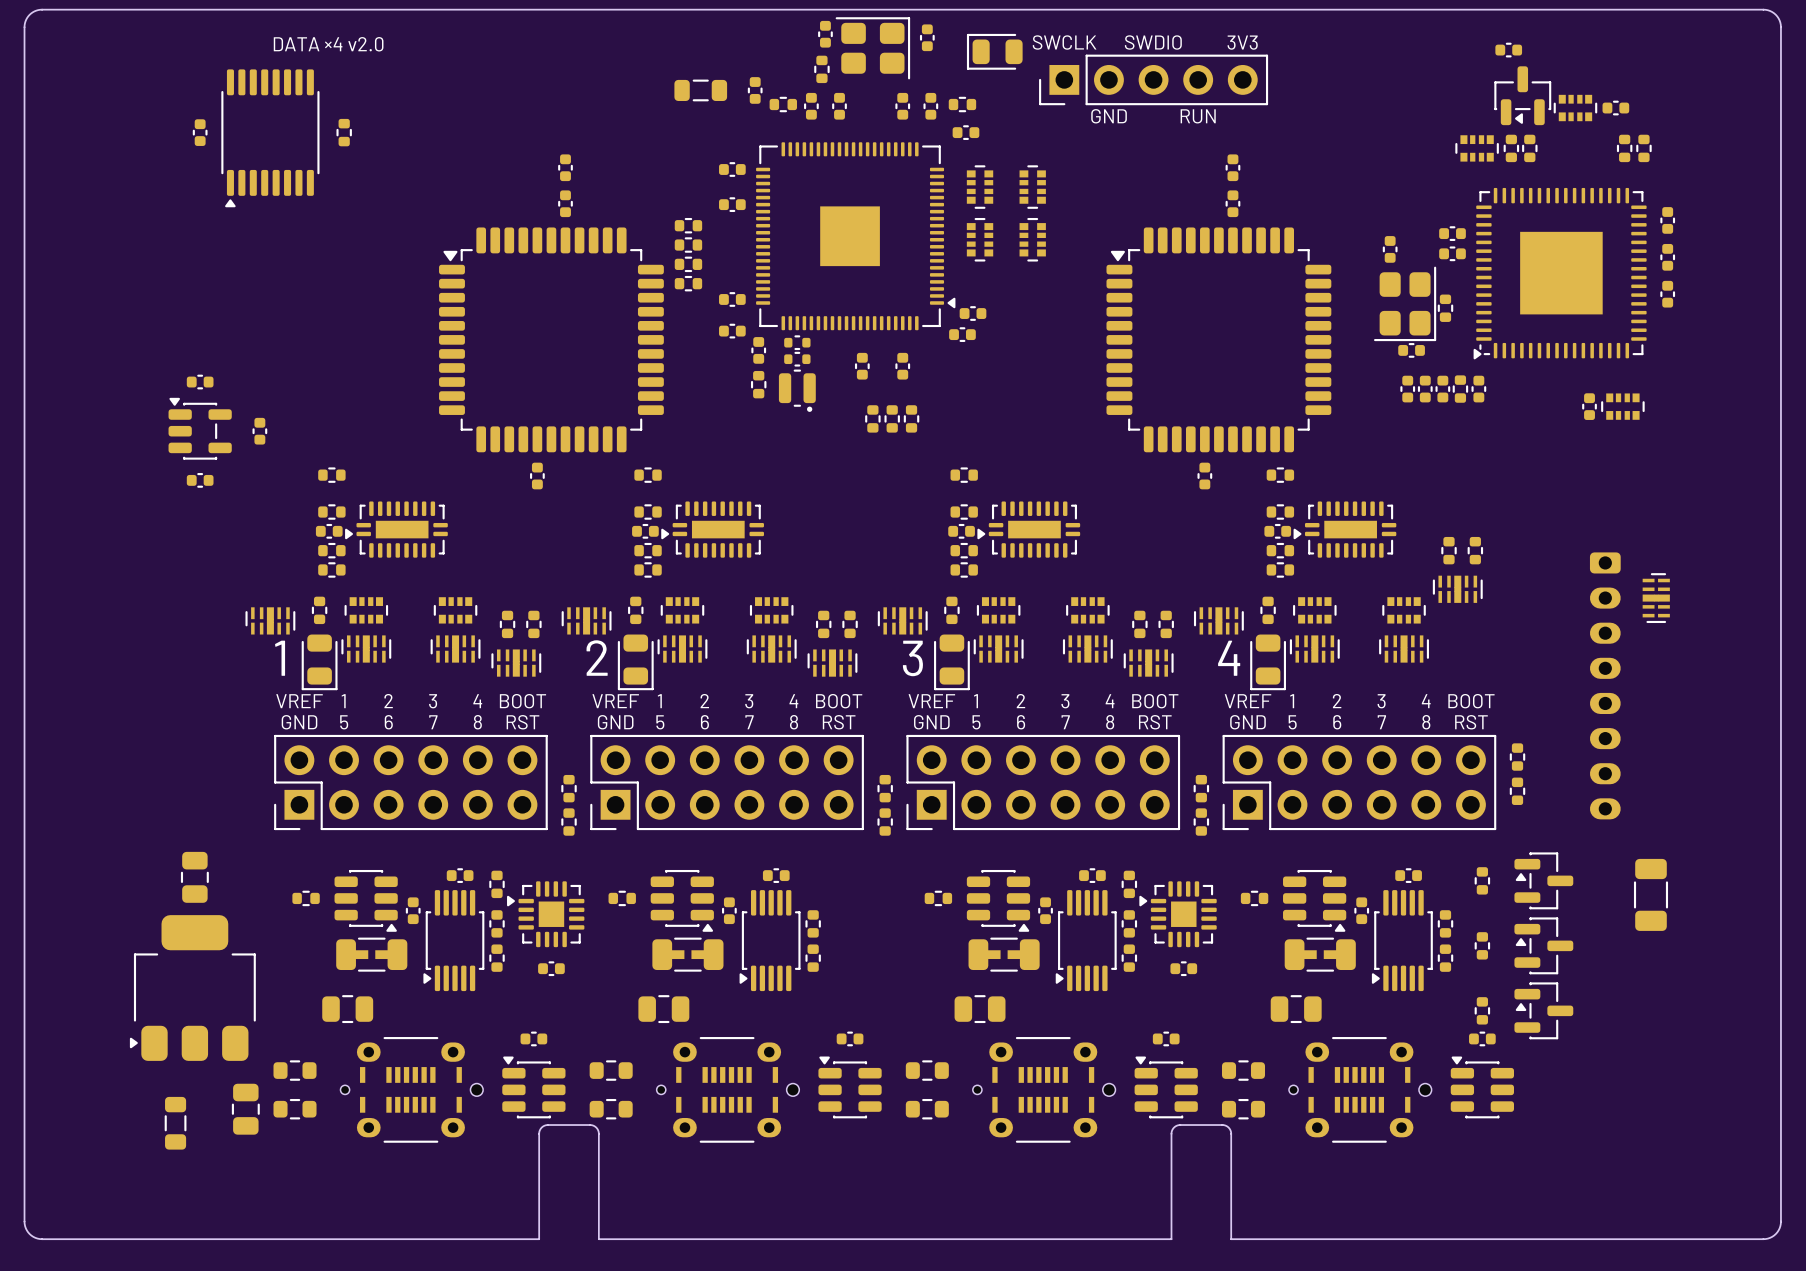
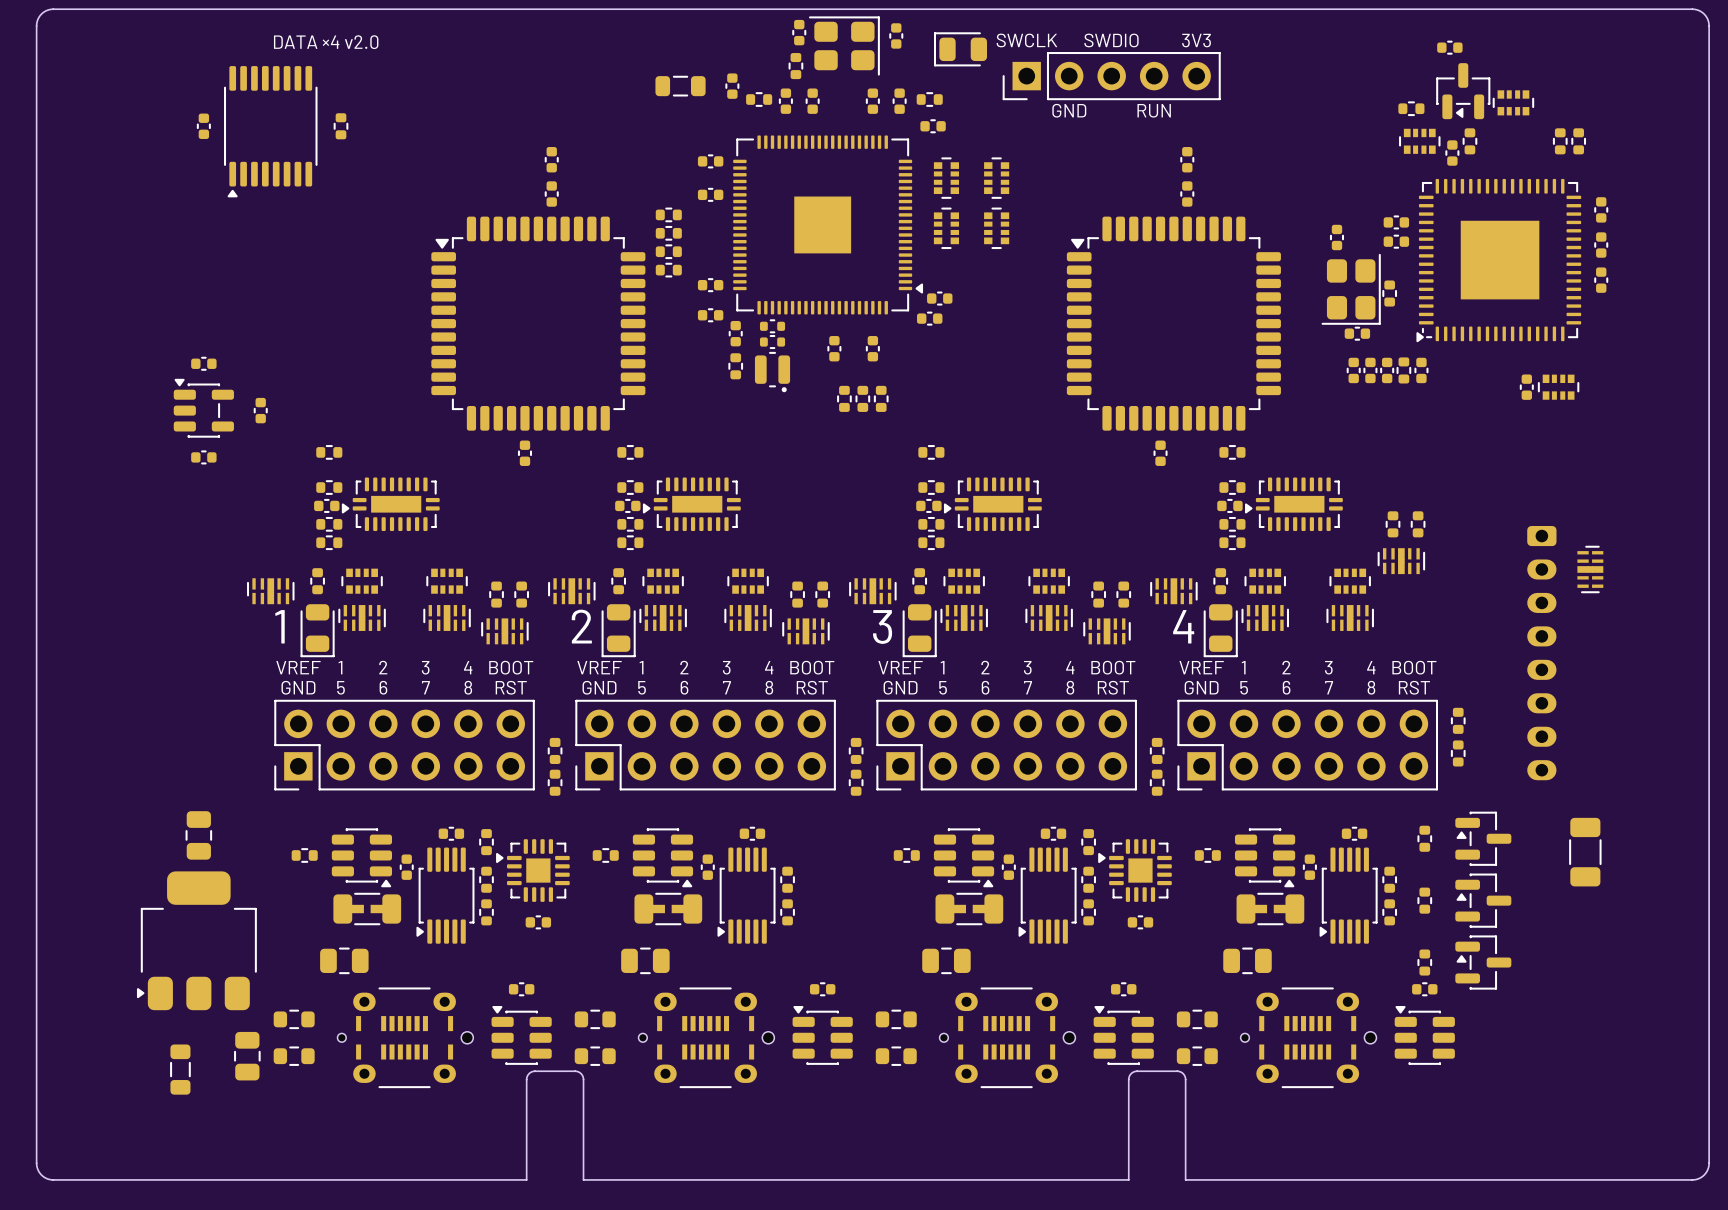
part: (1615, 108) -> none
part: none -> (1411, 108)
part footprint: [1503, 134, 1520, 163] -> [1445, 140, 1460, 166]

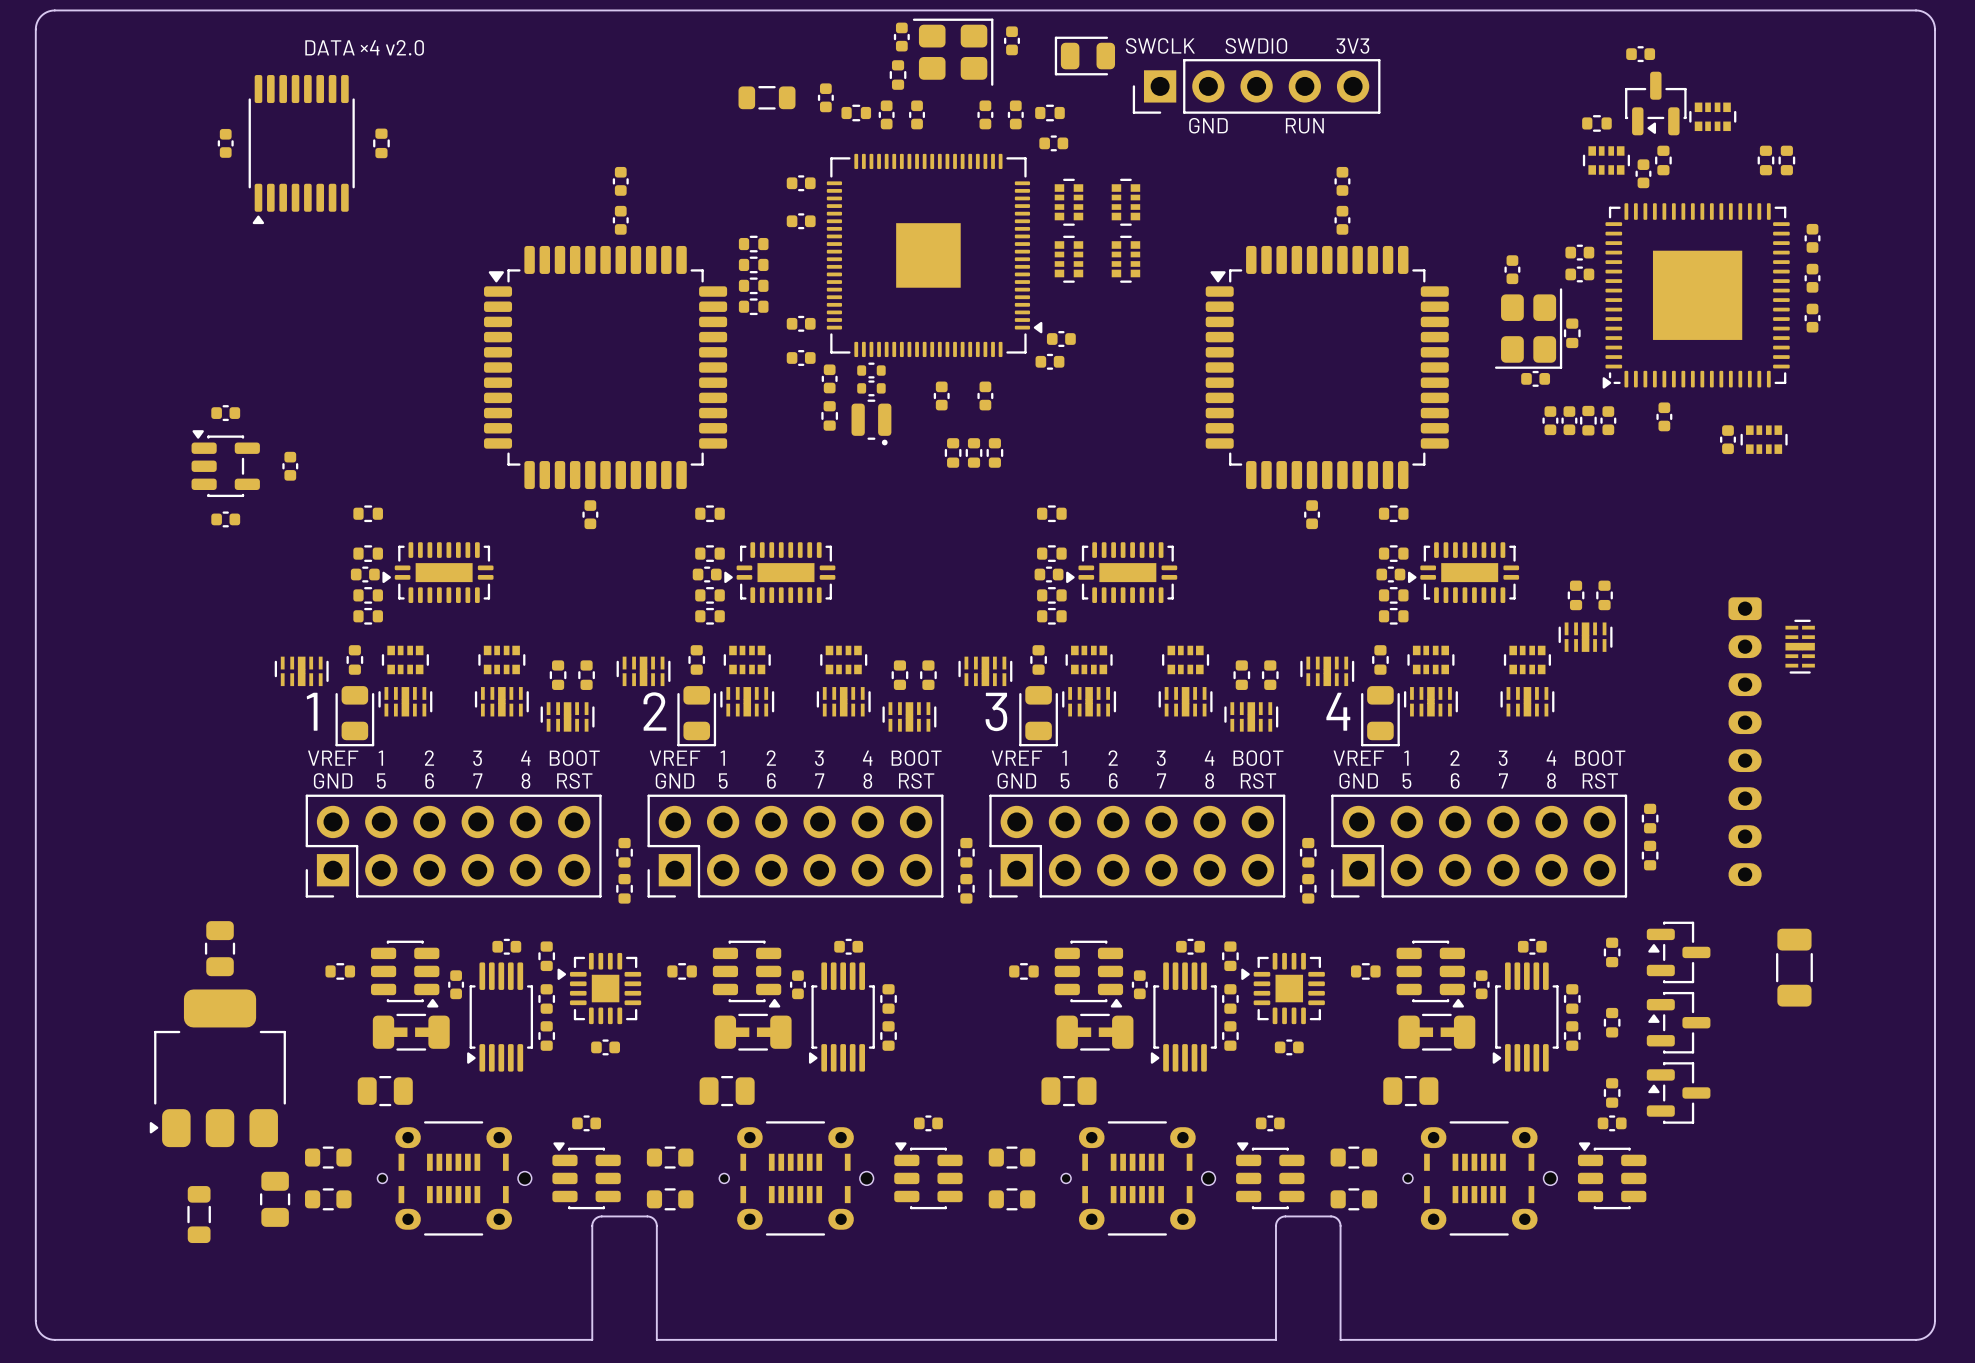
part position: (1353, 370) -> (1664, 416)

